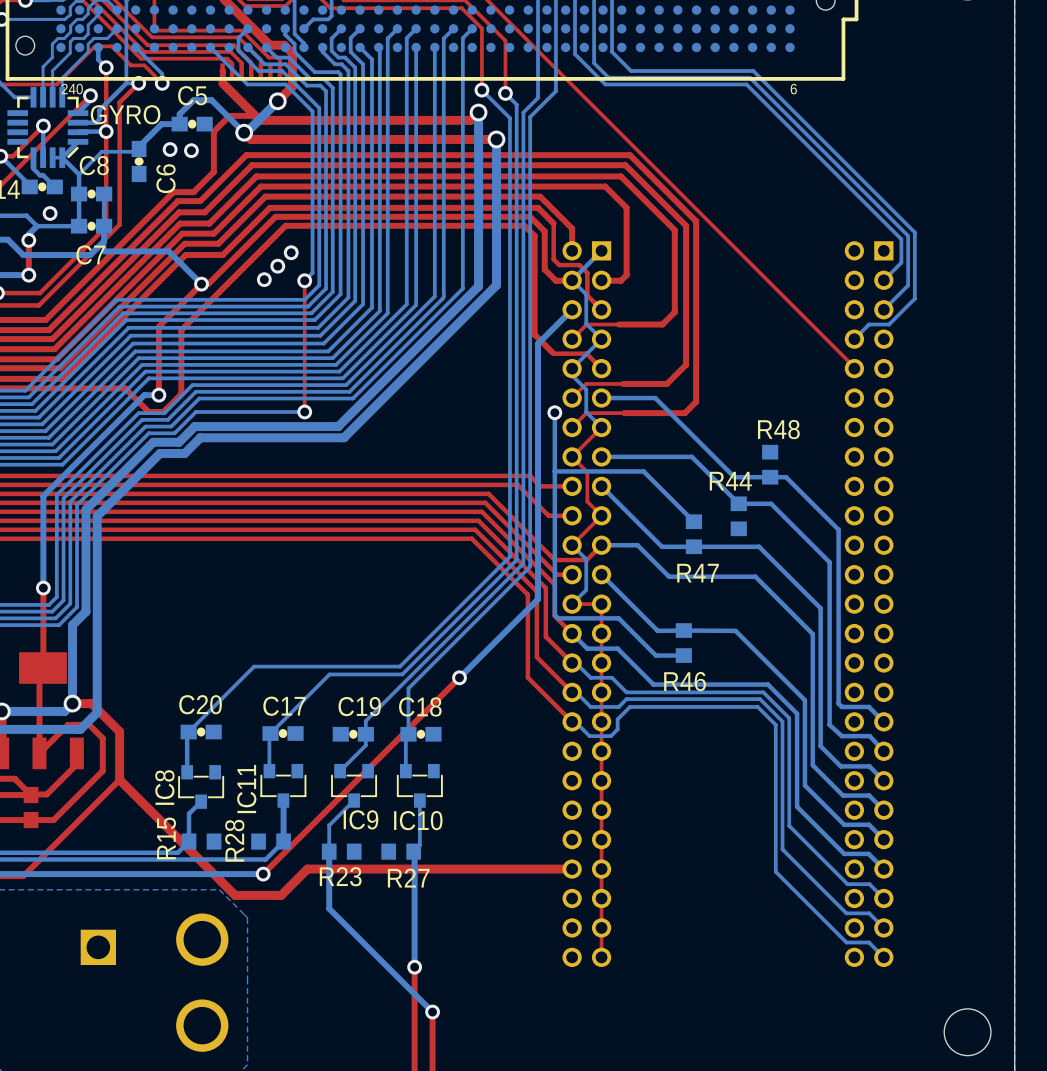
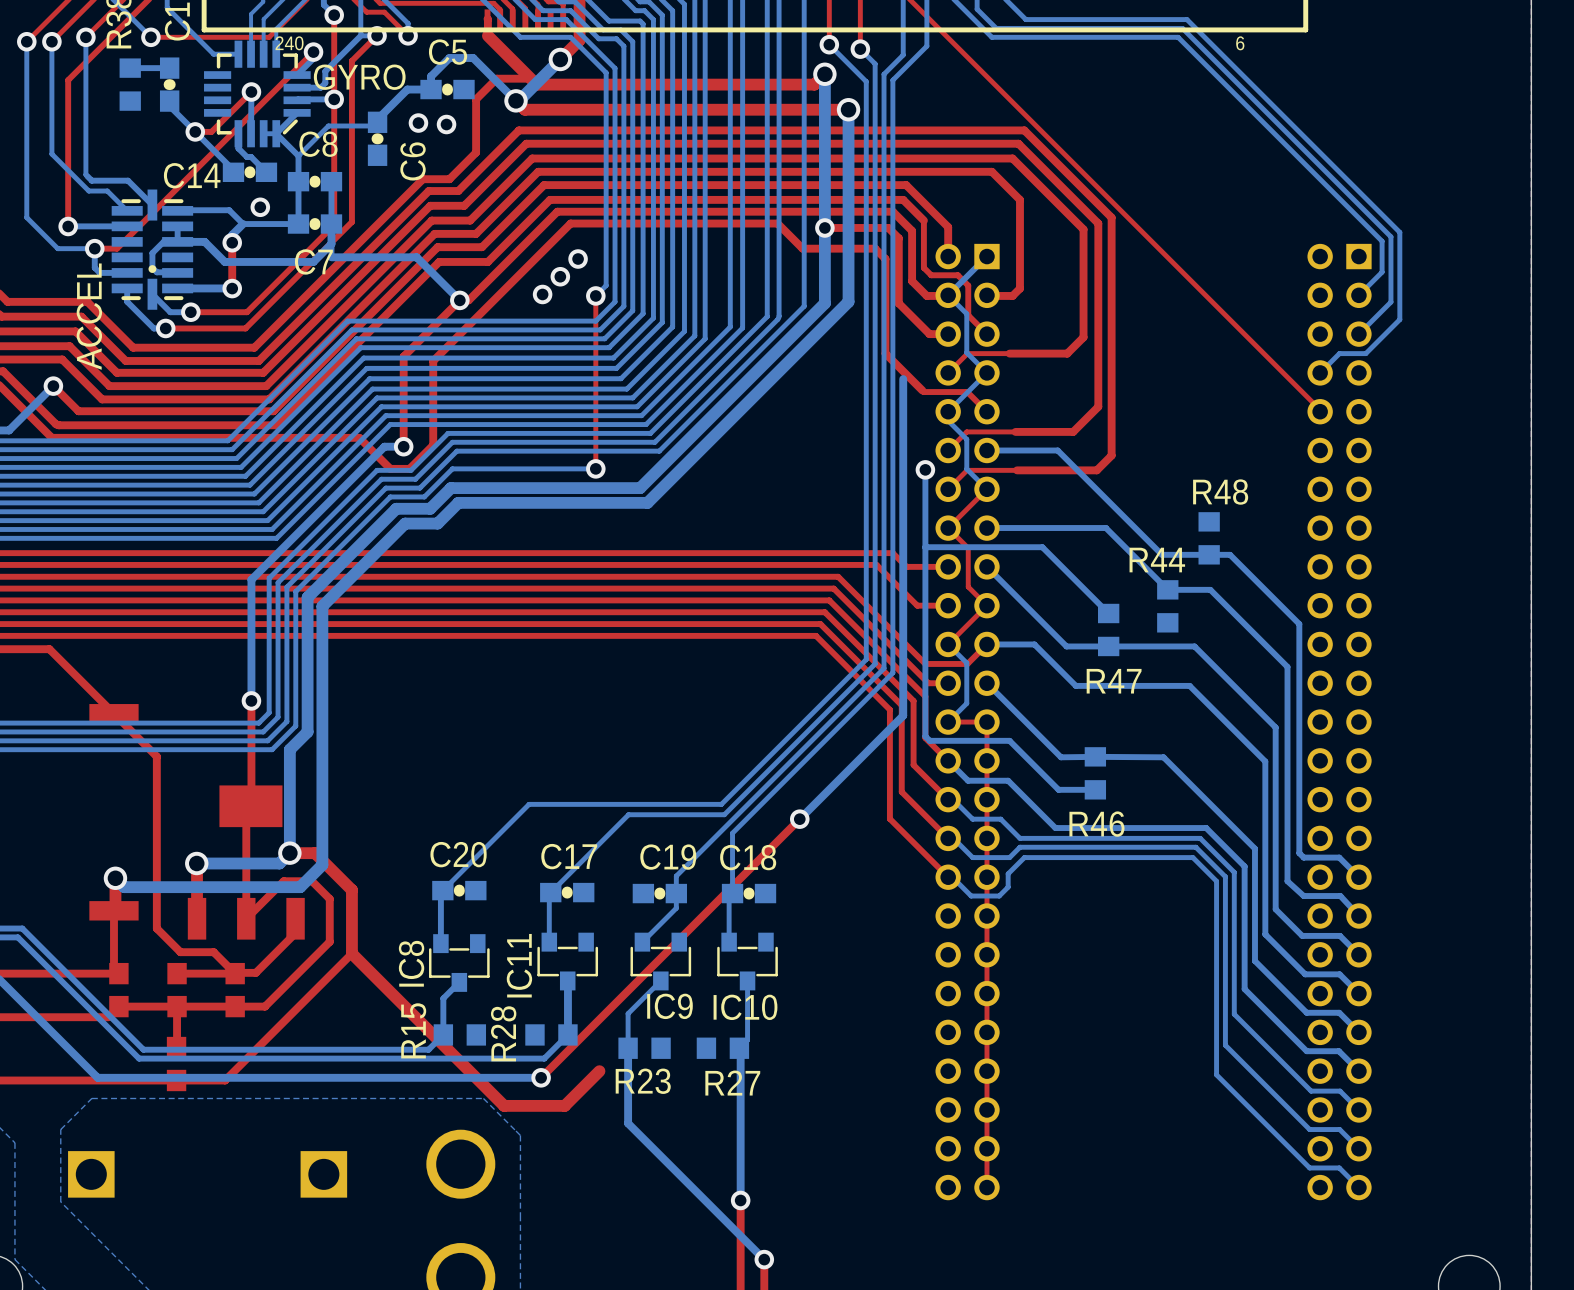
top track: (442, 225) (524, 225) (534, 237) -> (824, 227) (888, 227) (898, 238)
top track: none -> (777, 223) (802, 248) (875, 248) (885, 259) (885, 353) (898, 366)
via: none -> (824, 227)
top track: (534, 286) (534, 334) -> (898, 303) (929, 334) (948, 334)
bottom track: (572, 309) (538, 343) -> none
top track: (572, 869) (307, 869) -> none

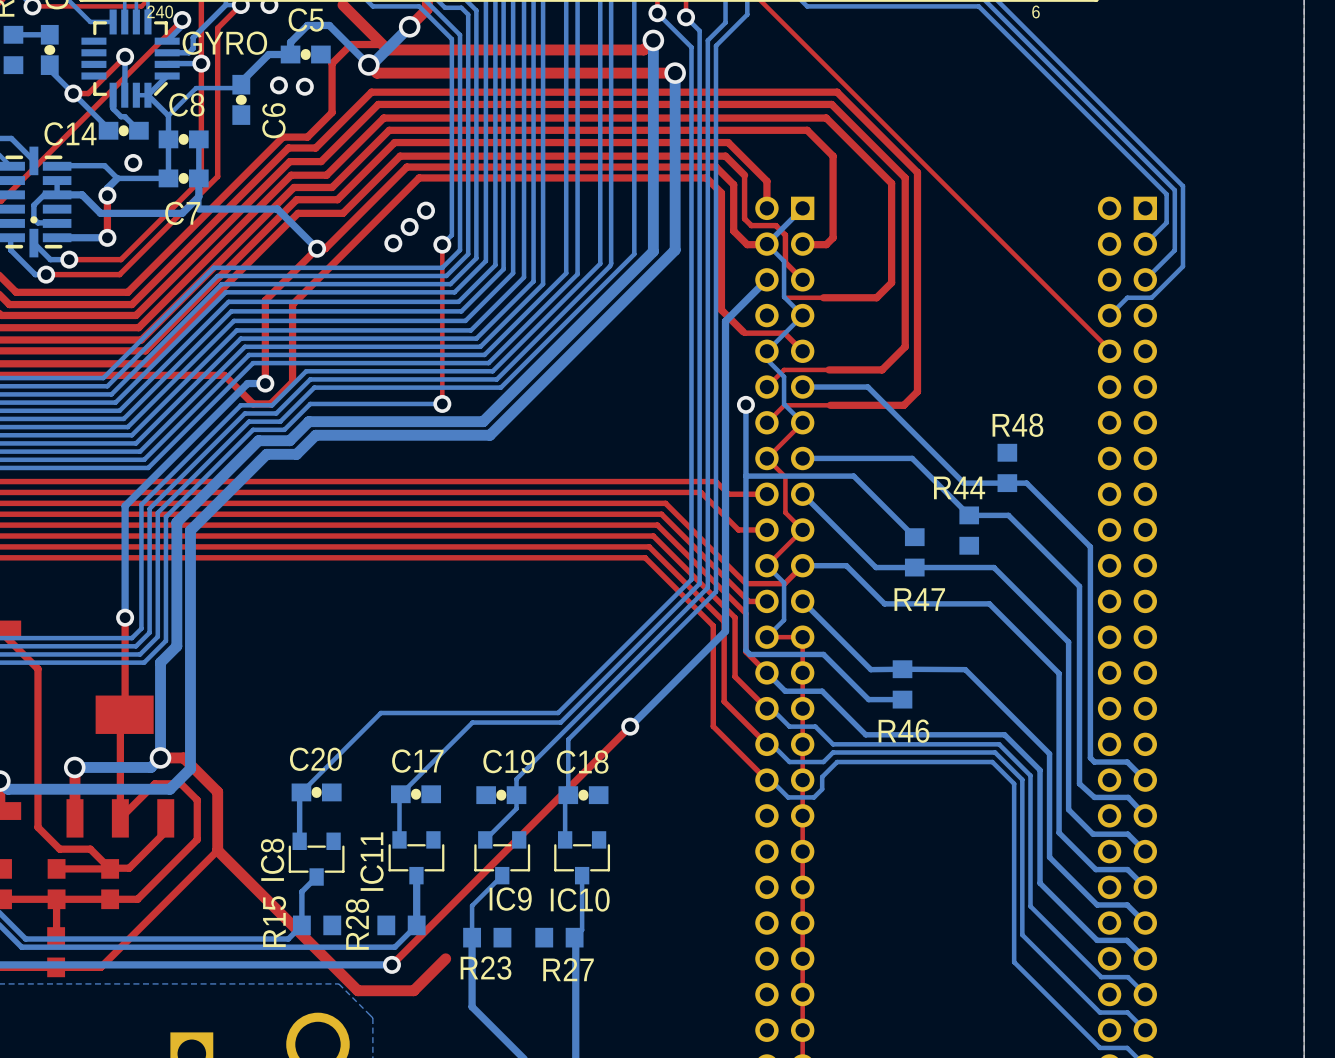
top track: (777, 223) (802, 248) (875, 248) (885, 259) (885, 353) (898, 366) -> none
top track: (824, 227) (888, 227) (898, 239) -> (609, 177) (706, 177) (721, 192)
via: (824, 227) -> none
top track: (898, 303) (929, 334) (948, 334) -> (721, 251) (721, 310)
bottom track: none -> (766, 279) (725, 321)
top track: (967, 353) (948, 372) -> none

